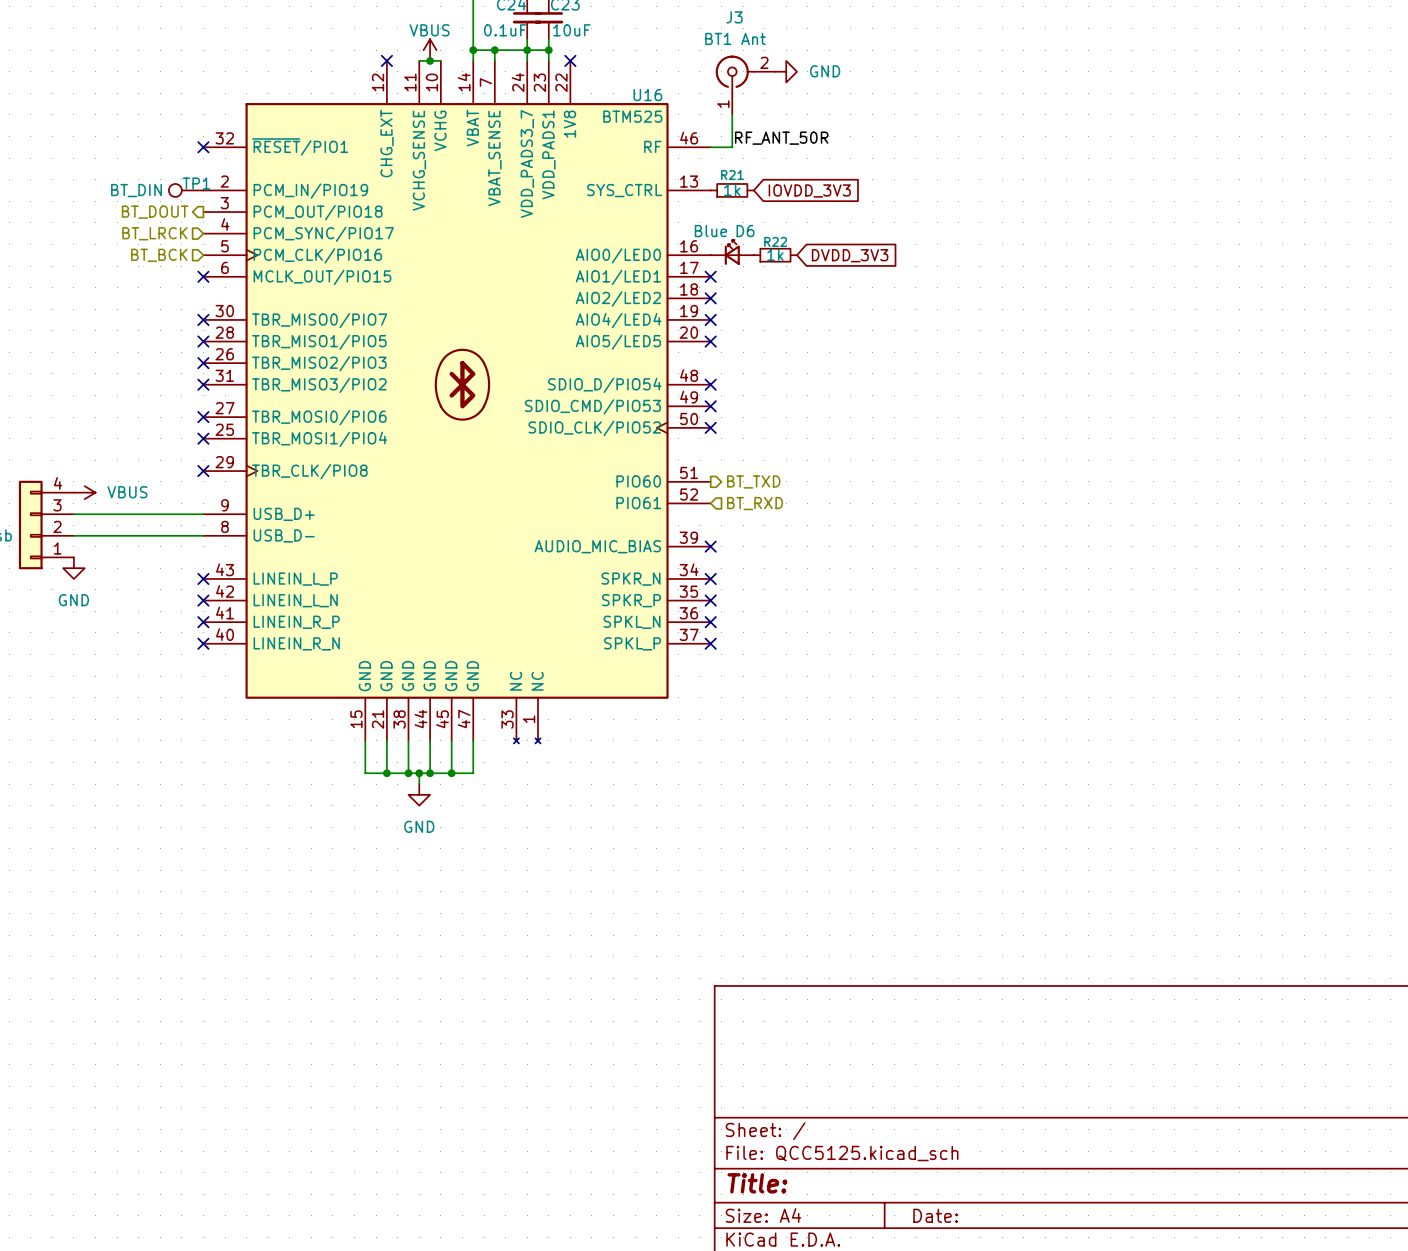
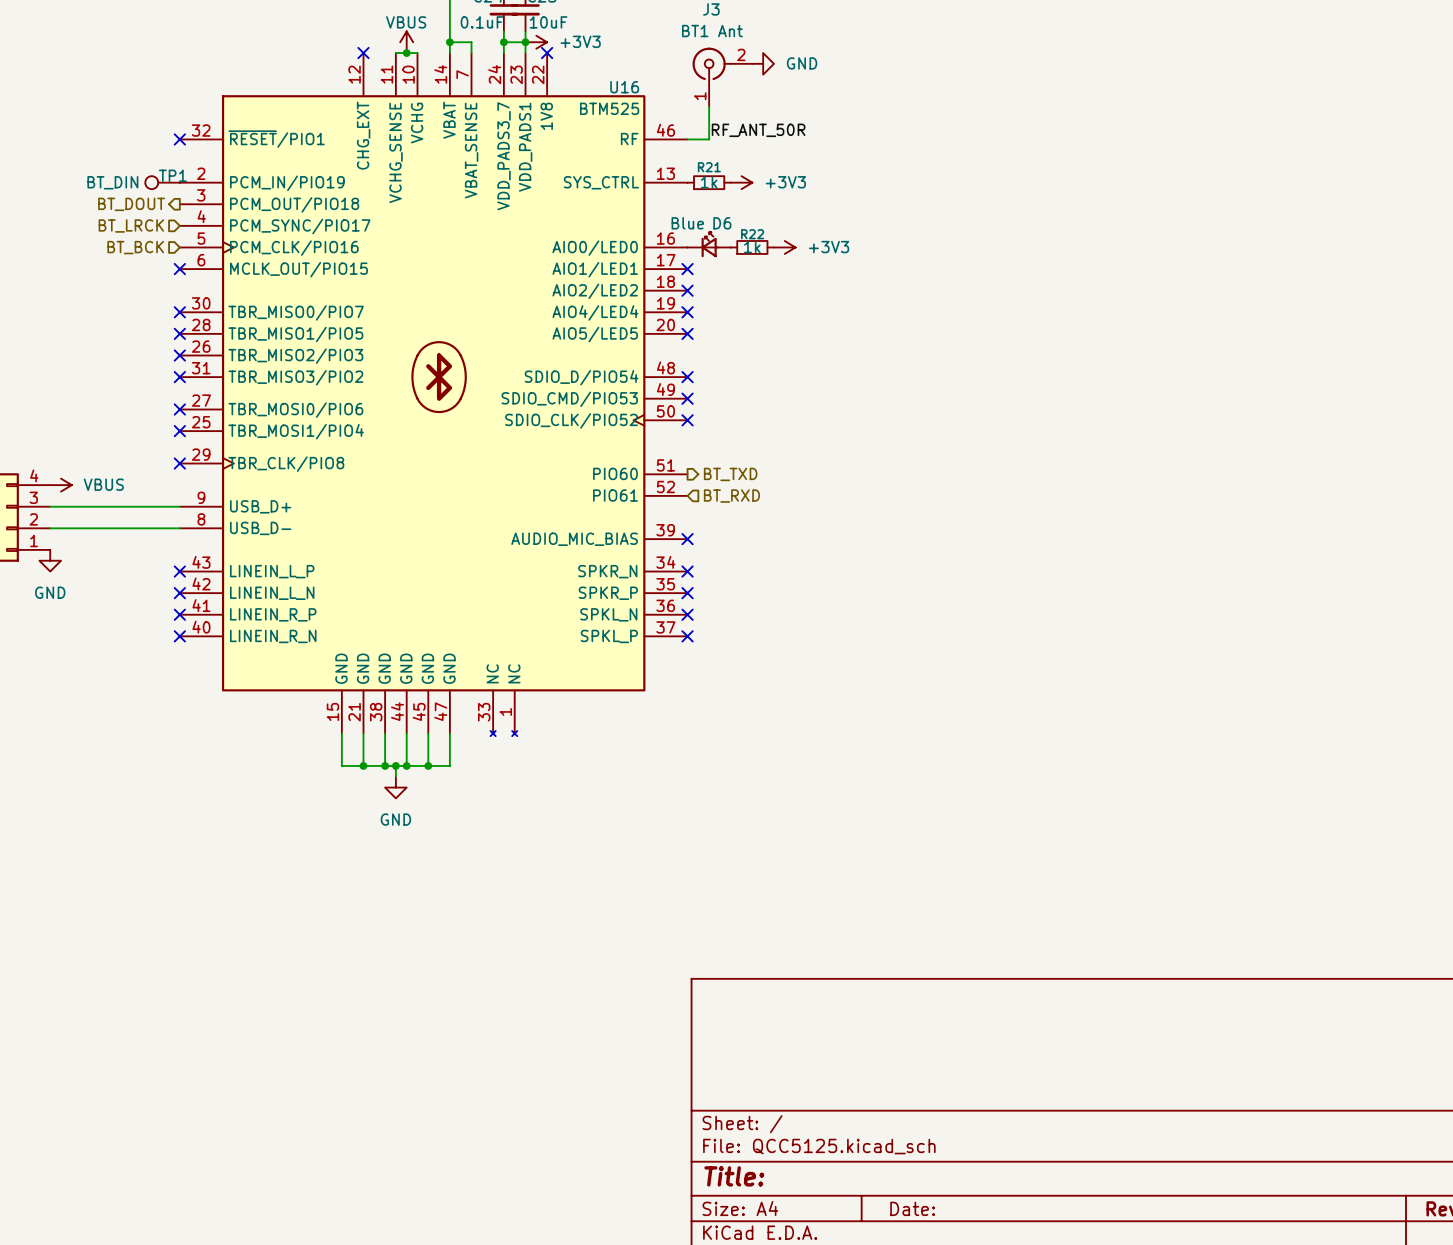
wire: (494, 50) (527, 50) -> none
junction: (494, 50) -> none
power symbol: none -> +3V3 (536, 42)
power symbol: none -> +3V3 (741, 182)
global label: IOVDD_3V3 (809, 190) -> none
power symbol: none -> +3V3 (784, 247)
global label: DVDD_3V3 (850, 255) -> none

